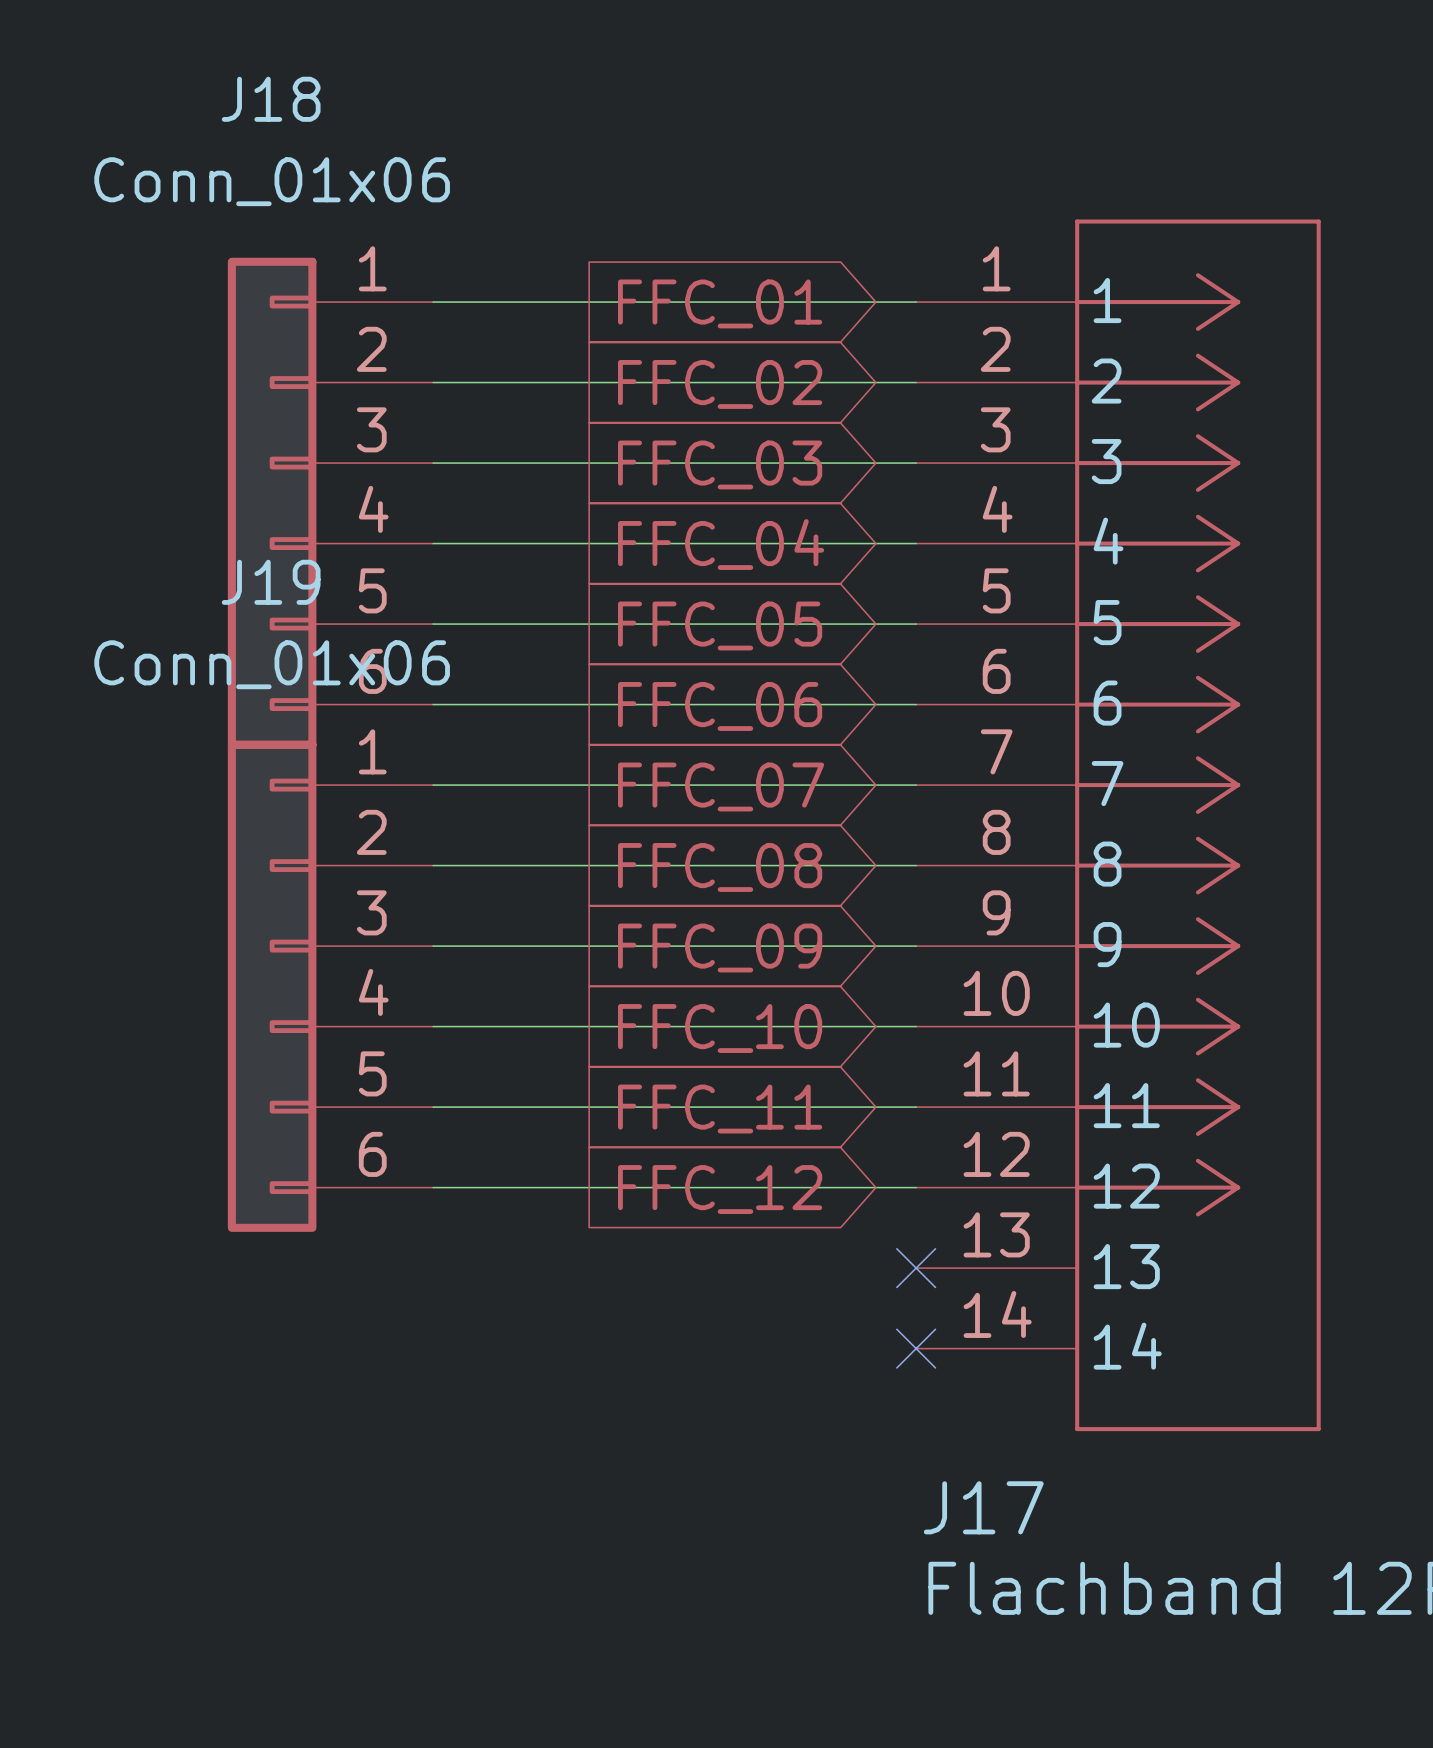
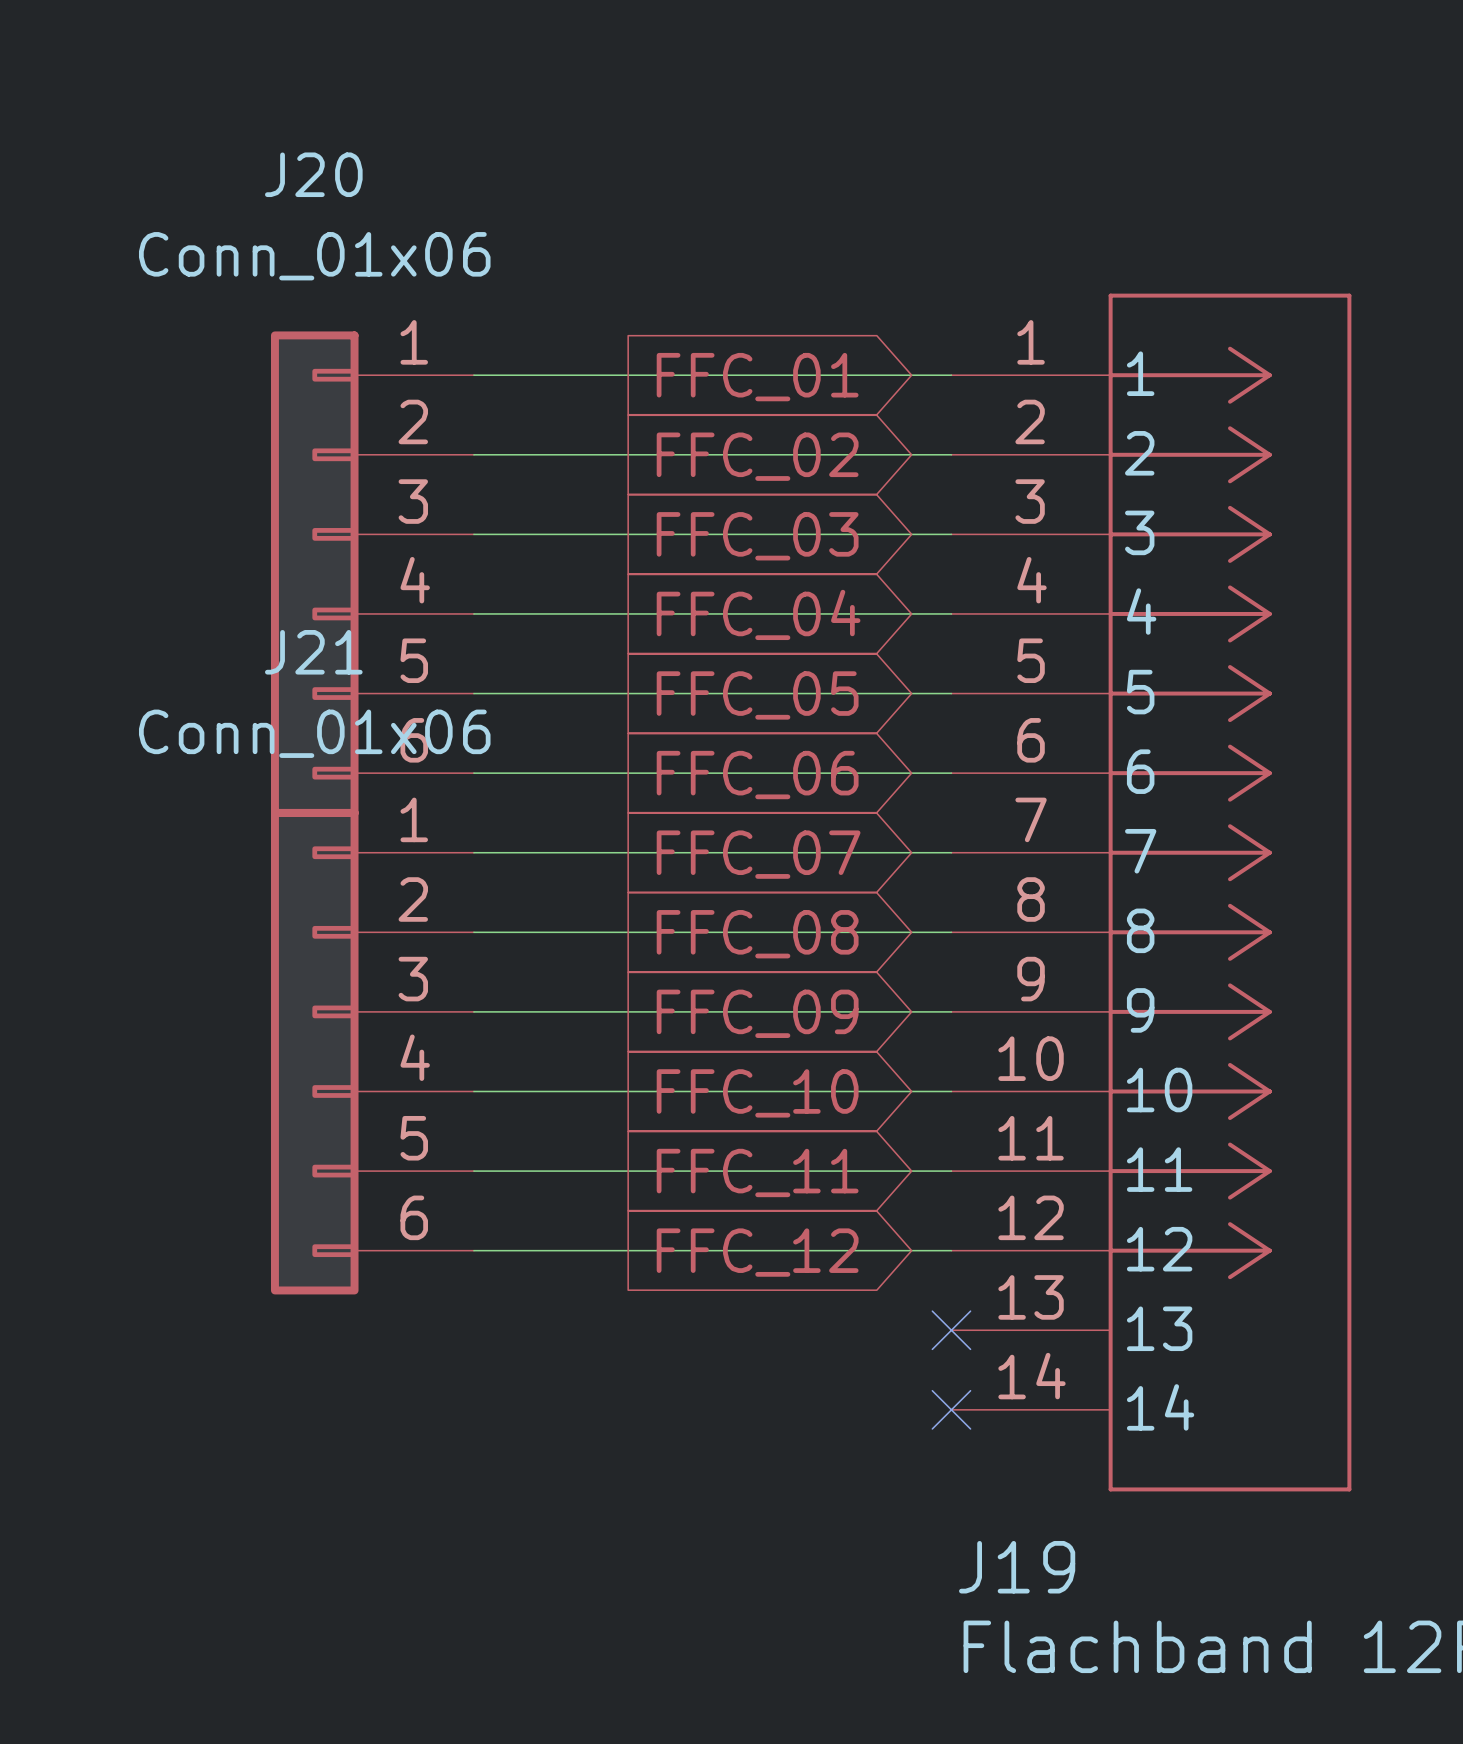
J18 name: J18 (271, 99) -> J20 (313, 174)
J19 name: J19 (271, 582) -> J21 (313, 652)
J17 name: J17 (983, 1507) -> J19 (1017, 1567)

